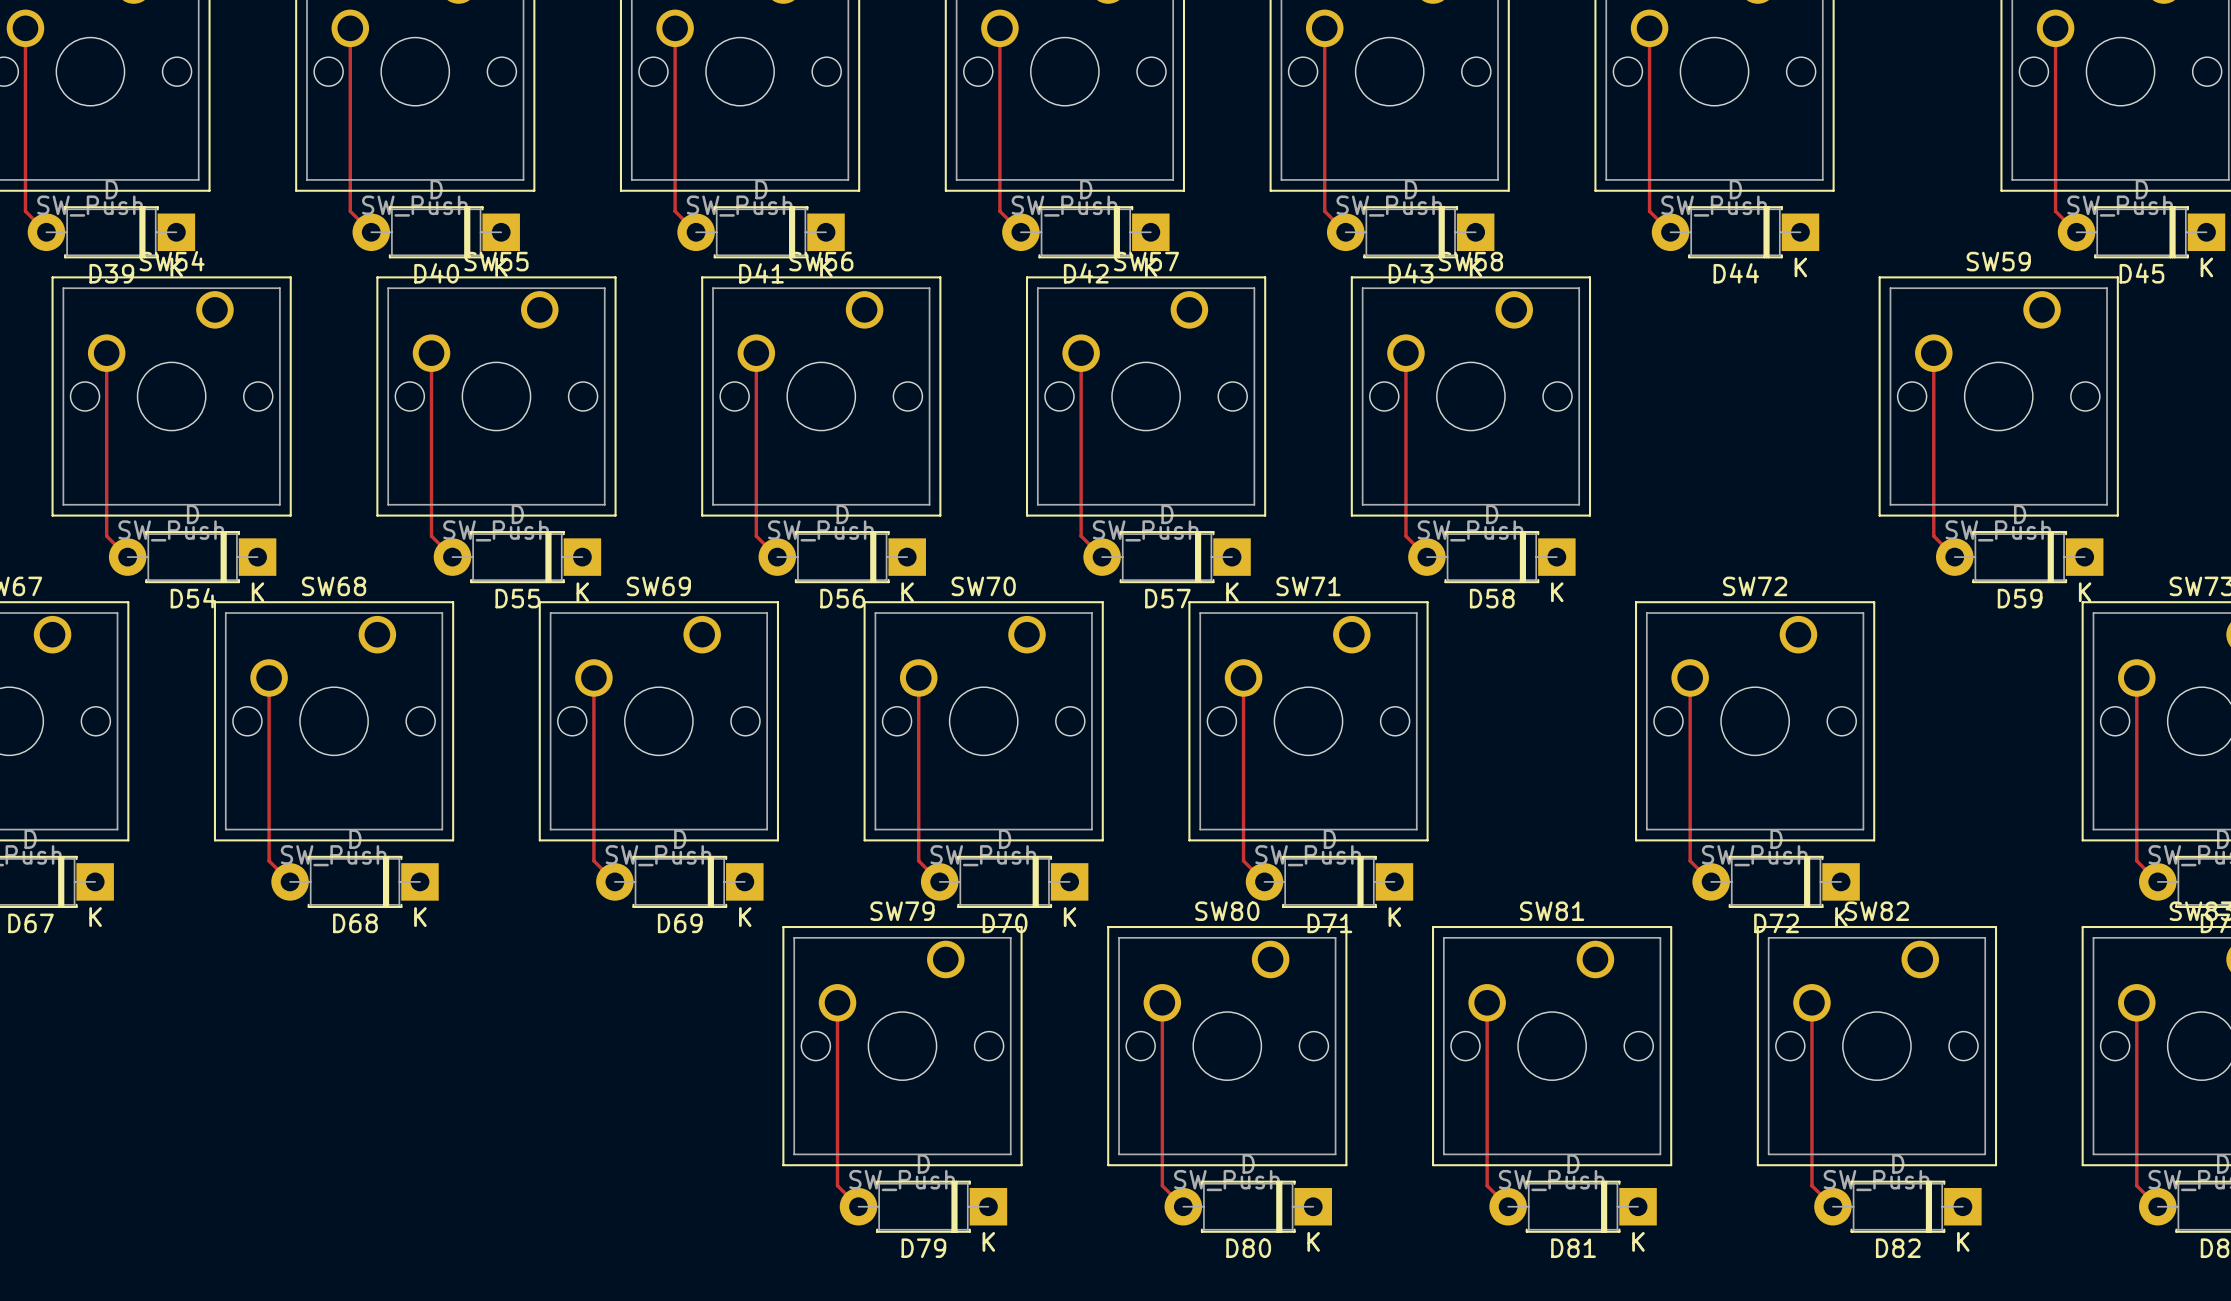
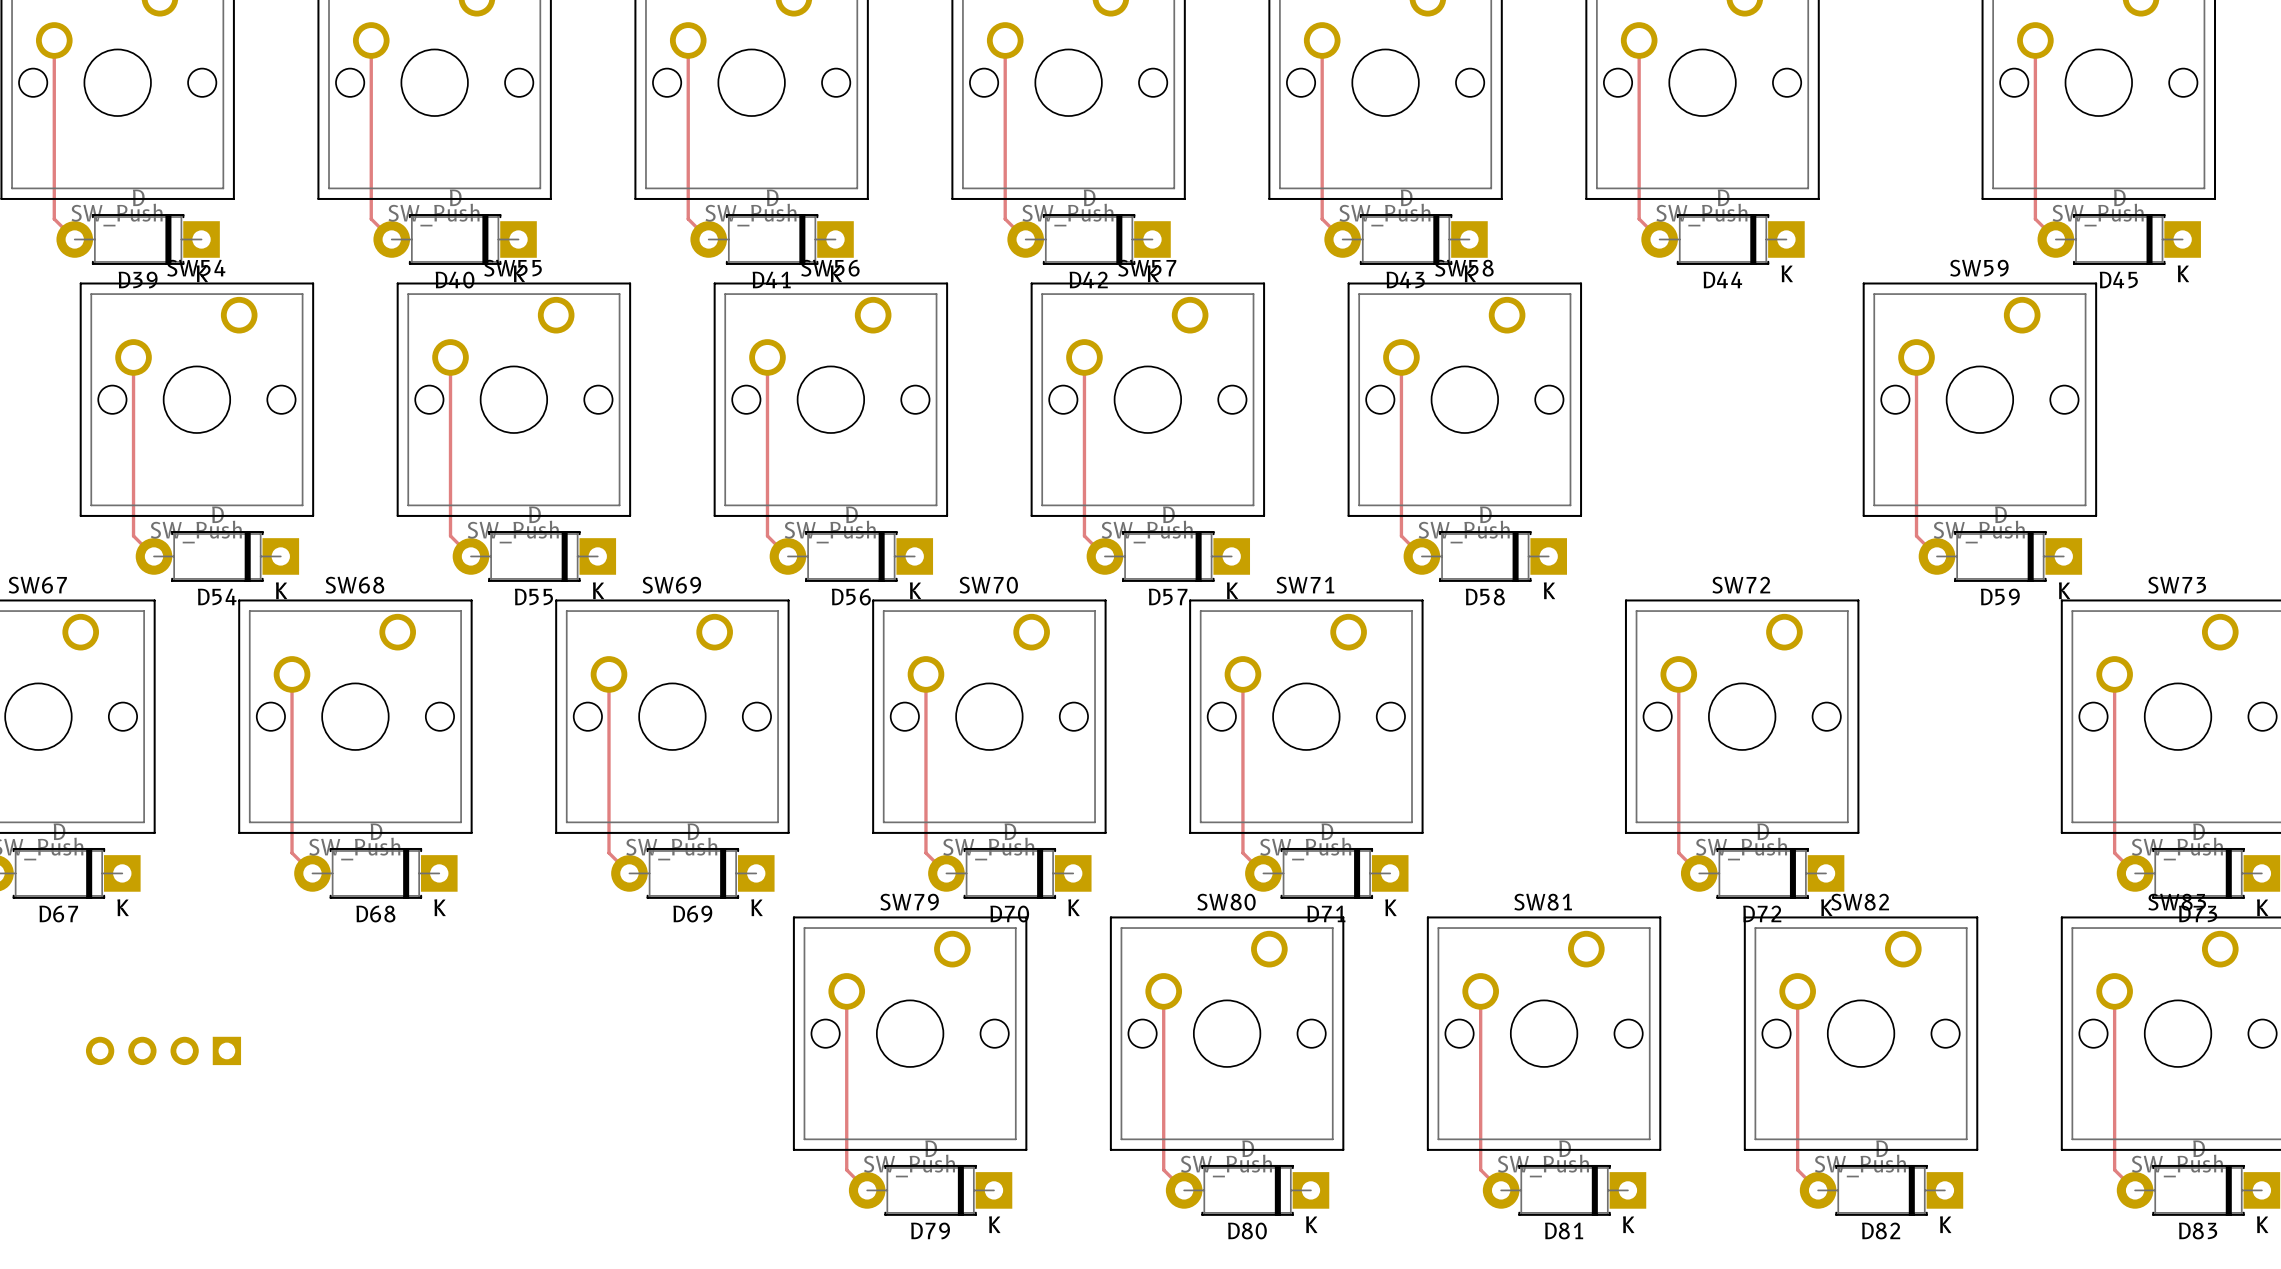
part: none -> (163, 1050)

